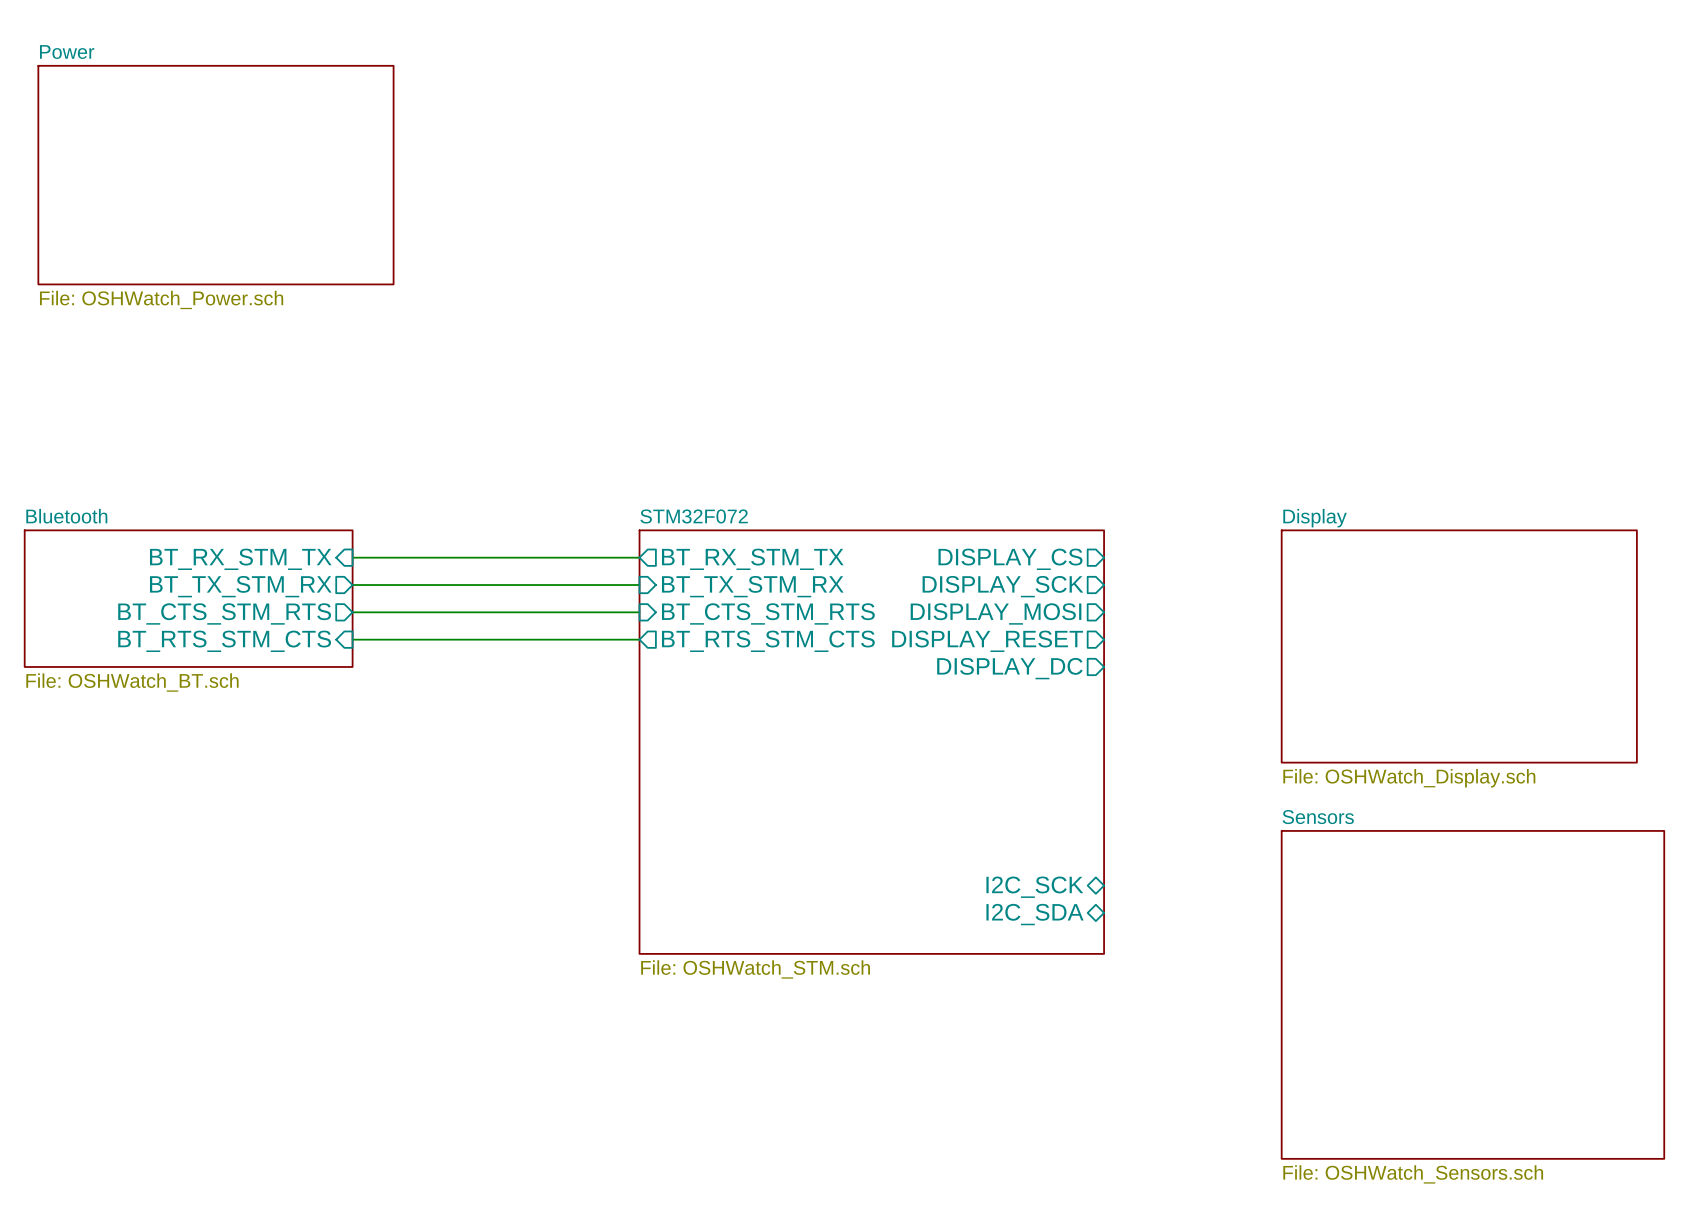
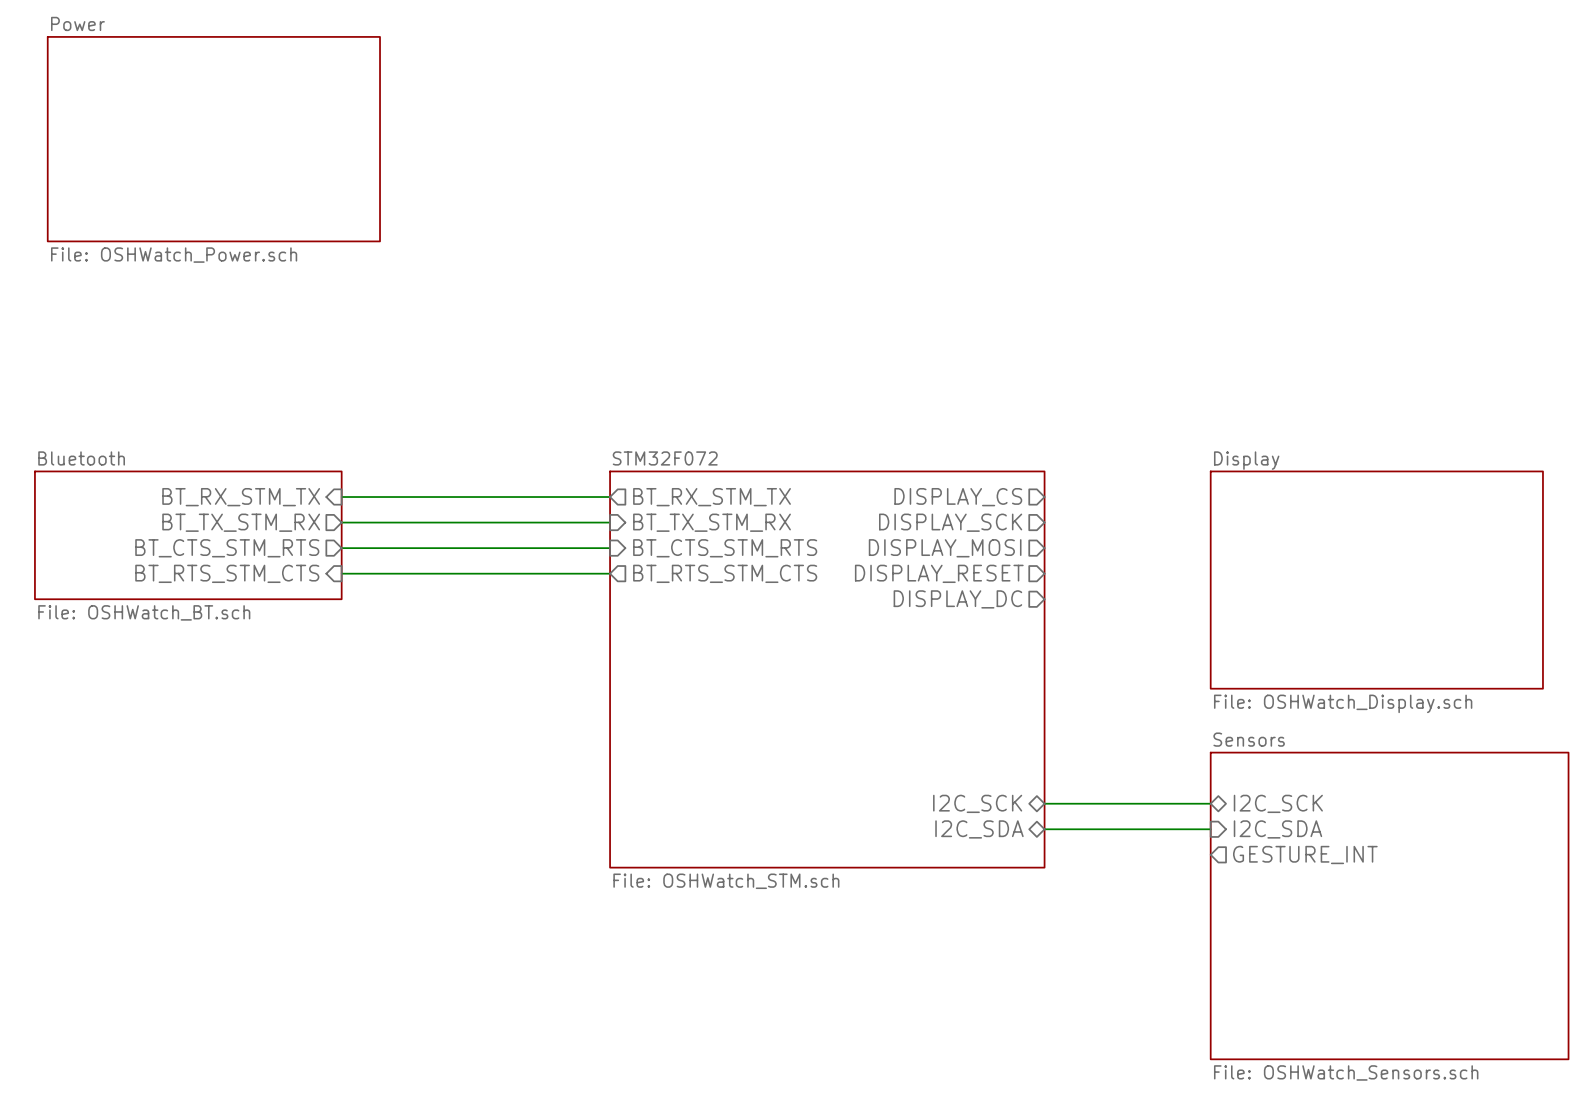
wire: none -> (1044, 803) (1210, 803)
sheet pin: none -> I2C_SCK (1278, 803)
wire: none -> (1044, 829) (1210, 829)
sheet pin: none -> I2C_SDA (1277, 829)
sheet pin: none -> GESTURE_INT (1305, 855)

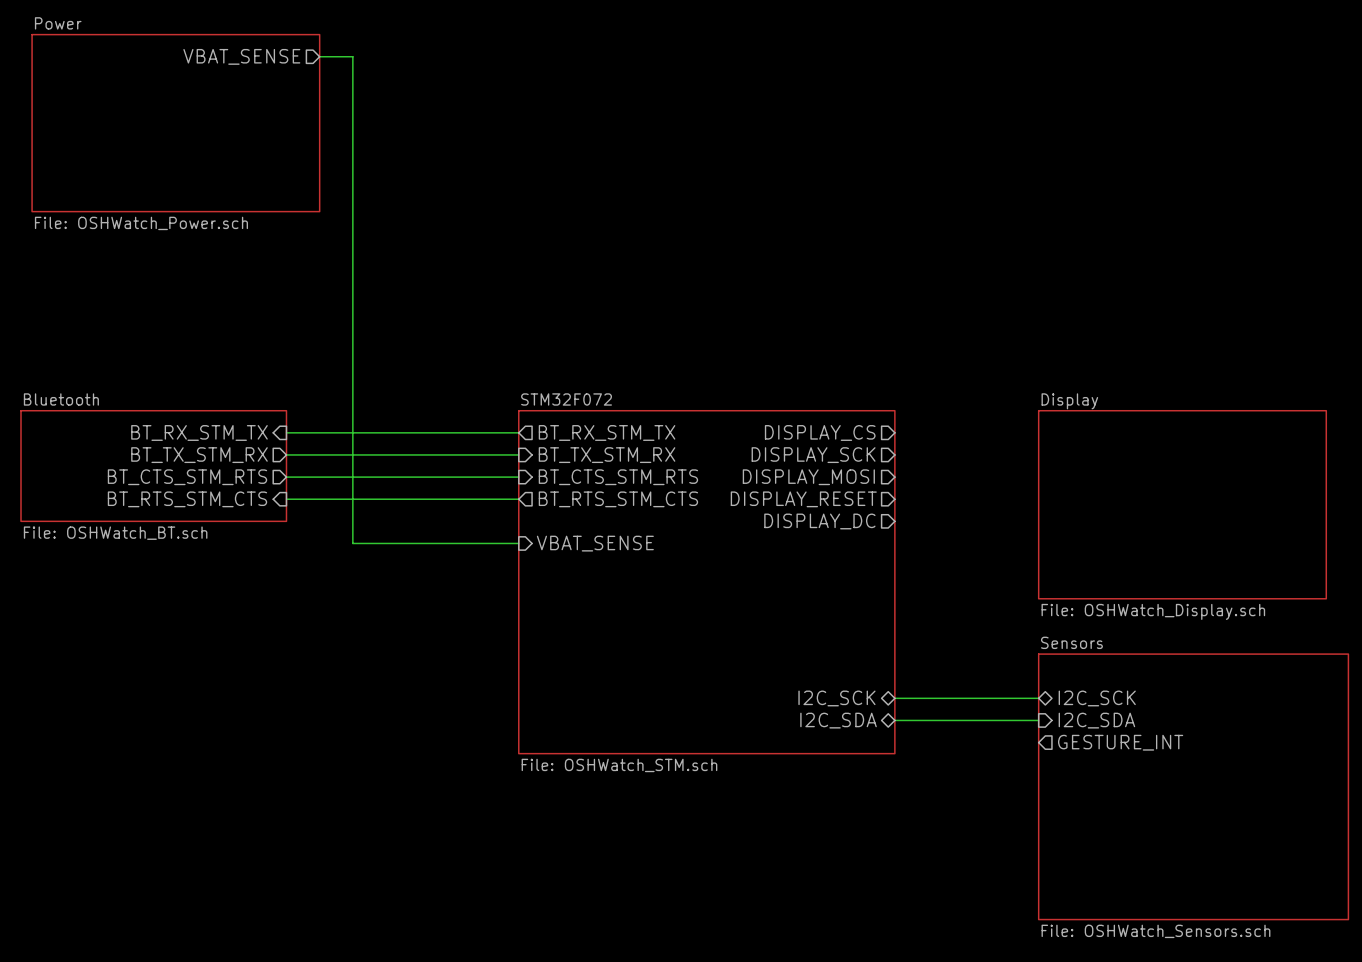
sheet pin: none -> VBAT_SENSE (241, 56)
wire: none -> (319, 56) (352, 56) (352, 543) (518, 543)
sheet pin: none -> VBAT_SENSE (595, 543)

